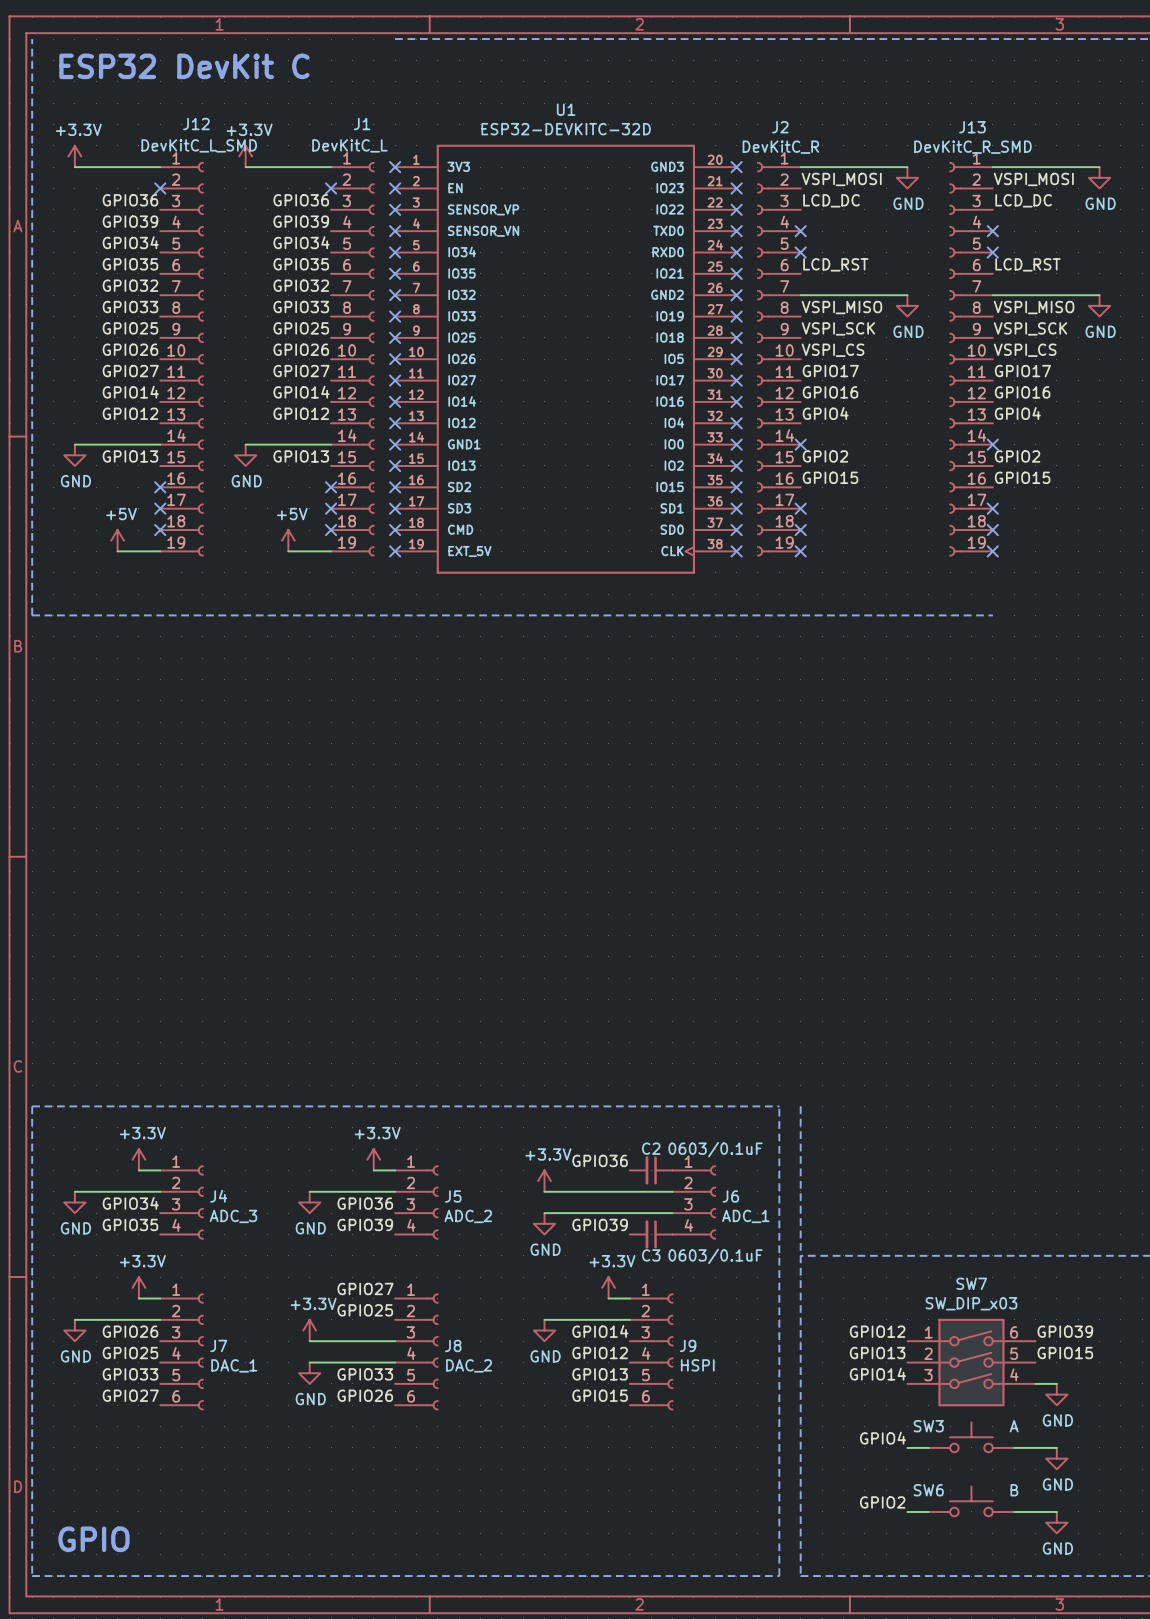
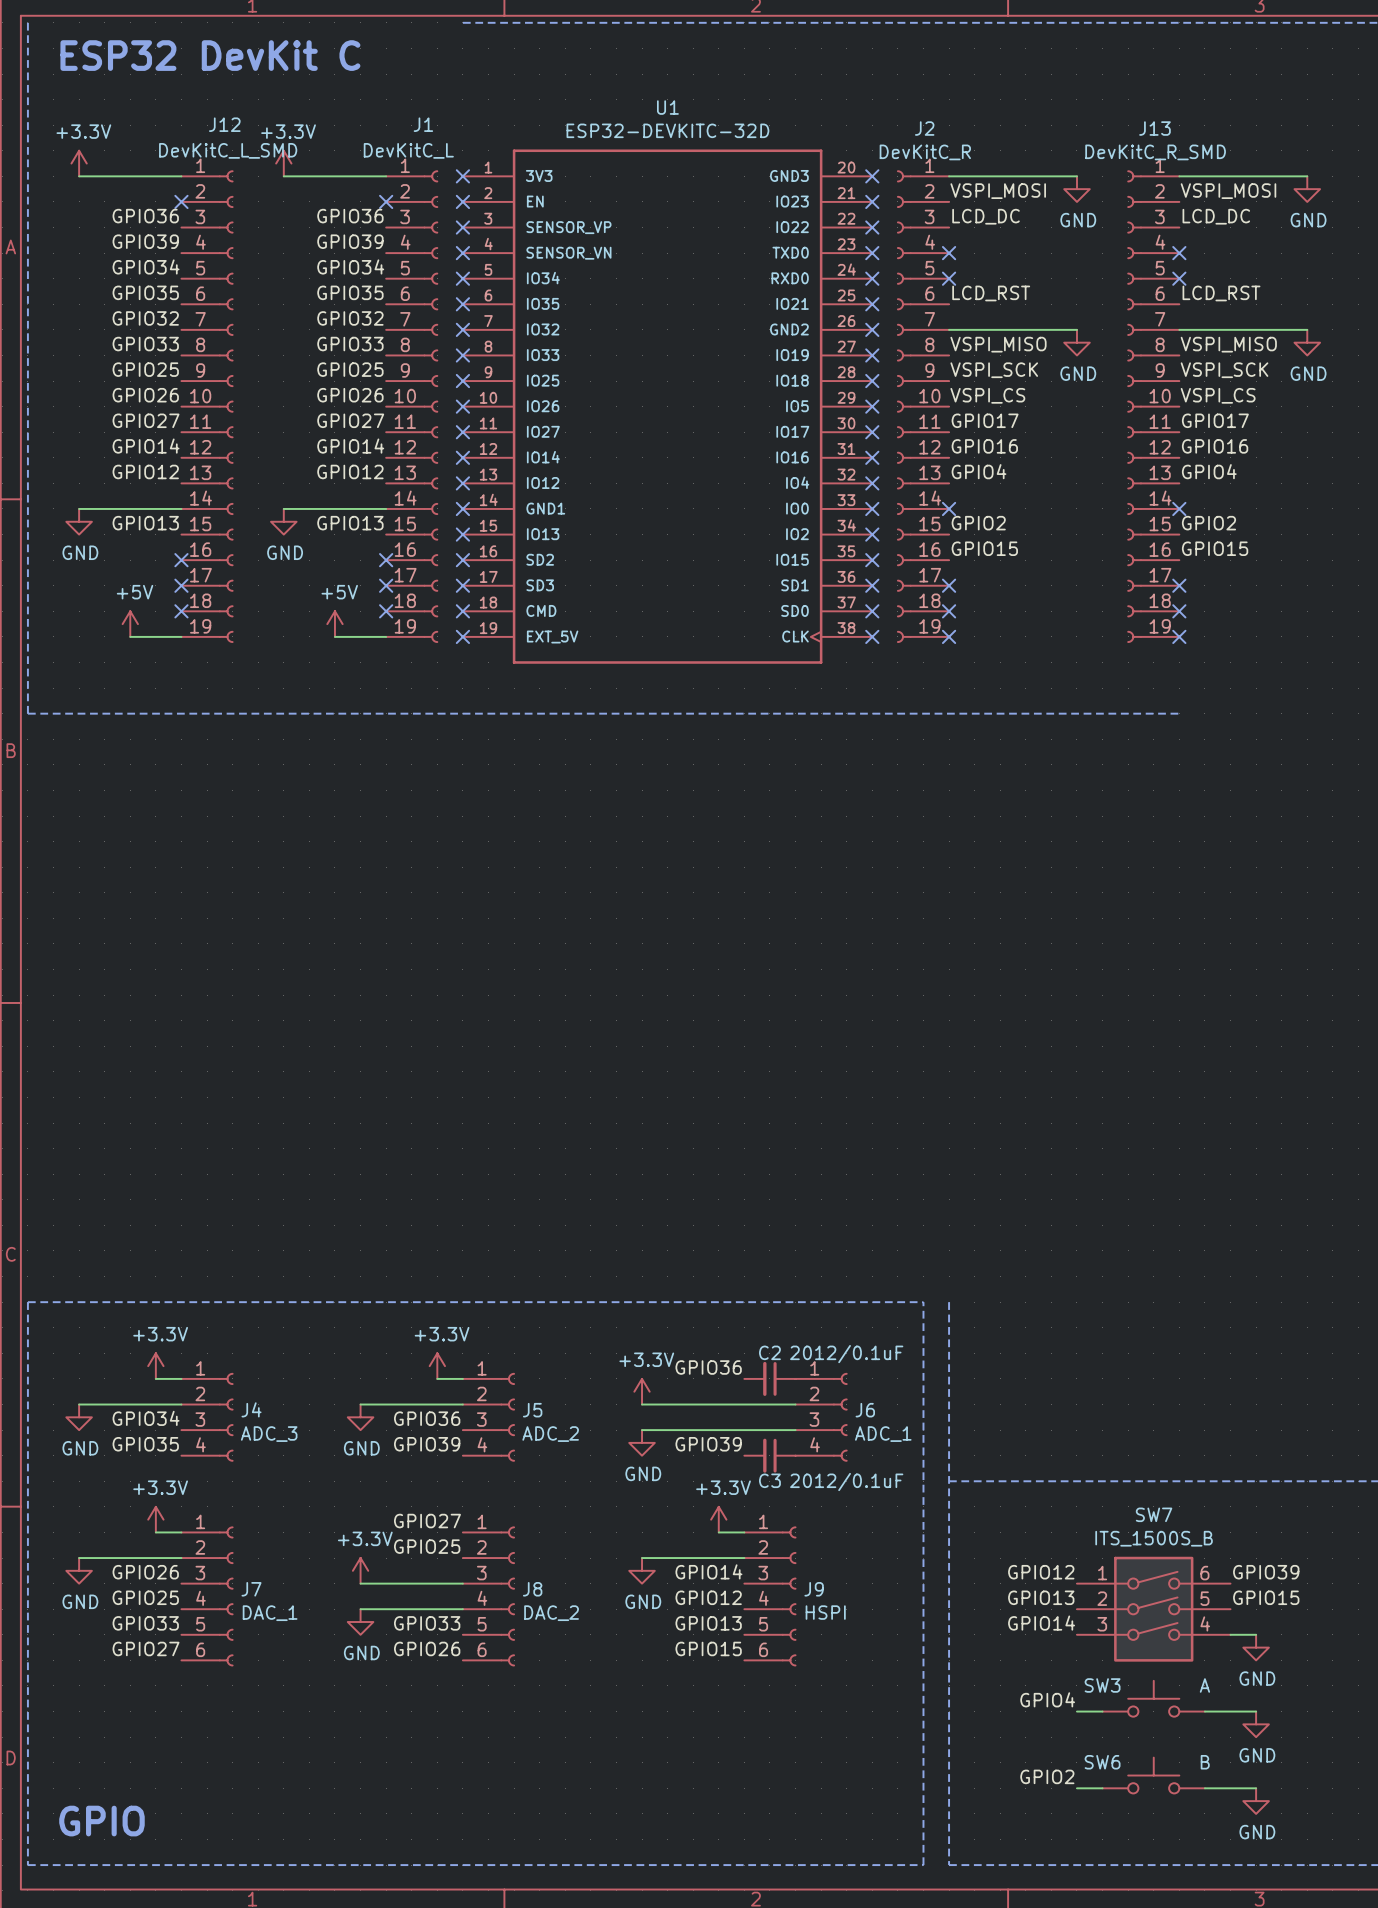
C2 value: 0603/0.1uF (715, 1149) -> 2012/0.1uF (846, 1354)
C3 value: 0603/0.1uF (715, 1256) -> 2012/0.1uF (846, 1482)
SW7 value: SW_DIP_x03 (971, 1303) -> ITS_1500S_B (1154, 1538)

